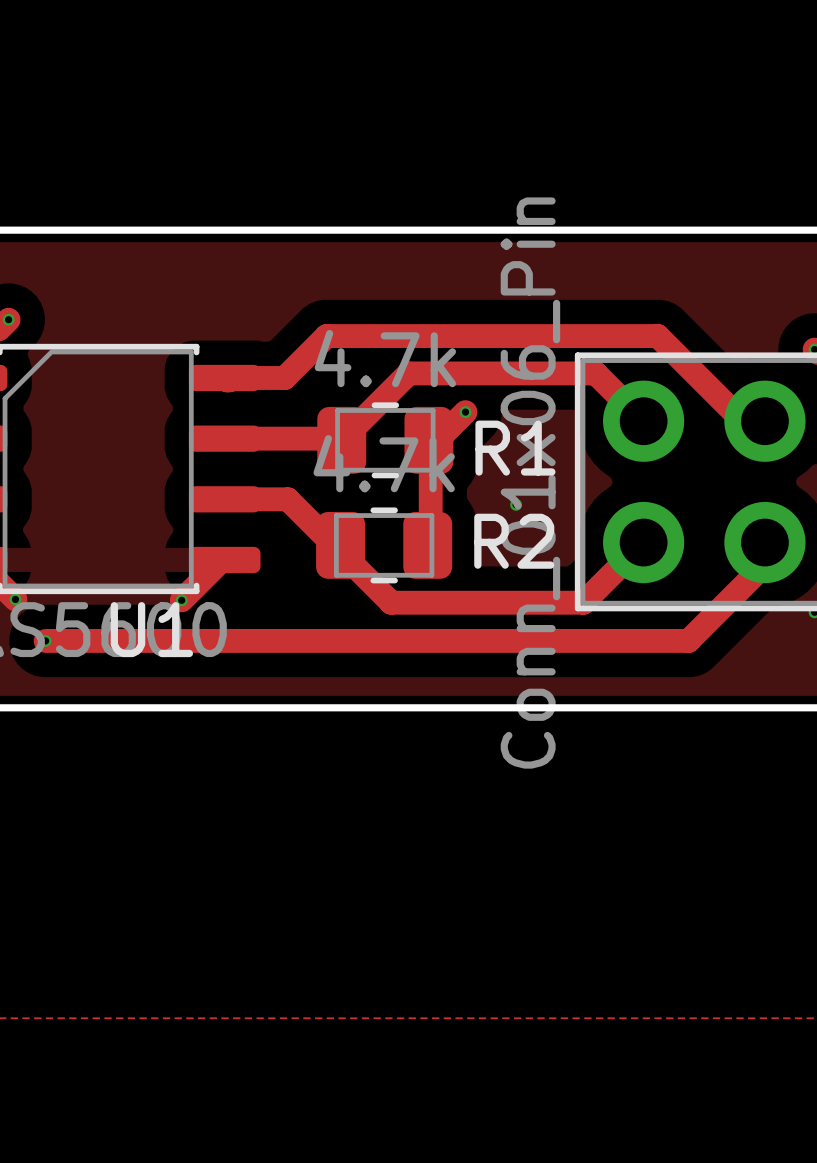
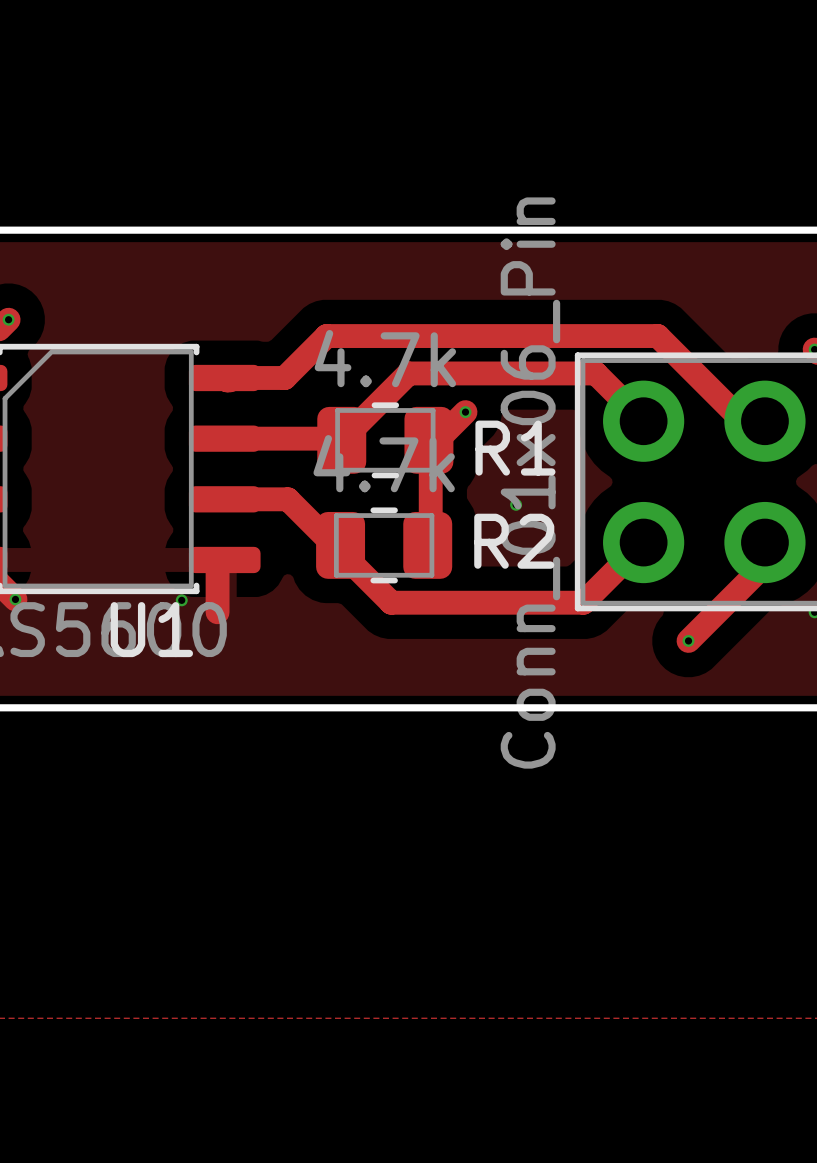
track: (217, 564) (181, 600) -> (217, 564) (217, 612)
track: (45, 640) (688, 640) -> none
via: (45, 640) -> none
via: none -> (688, 640)

